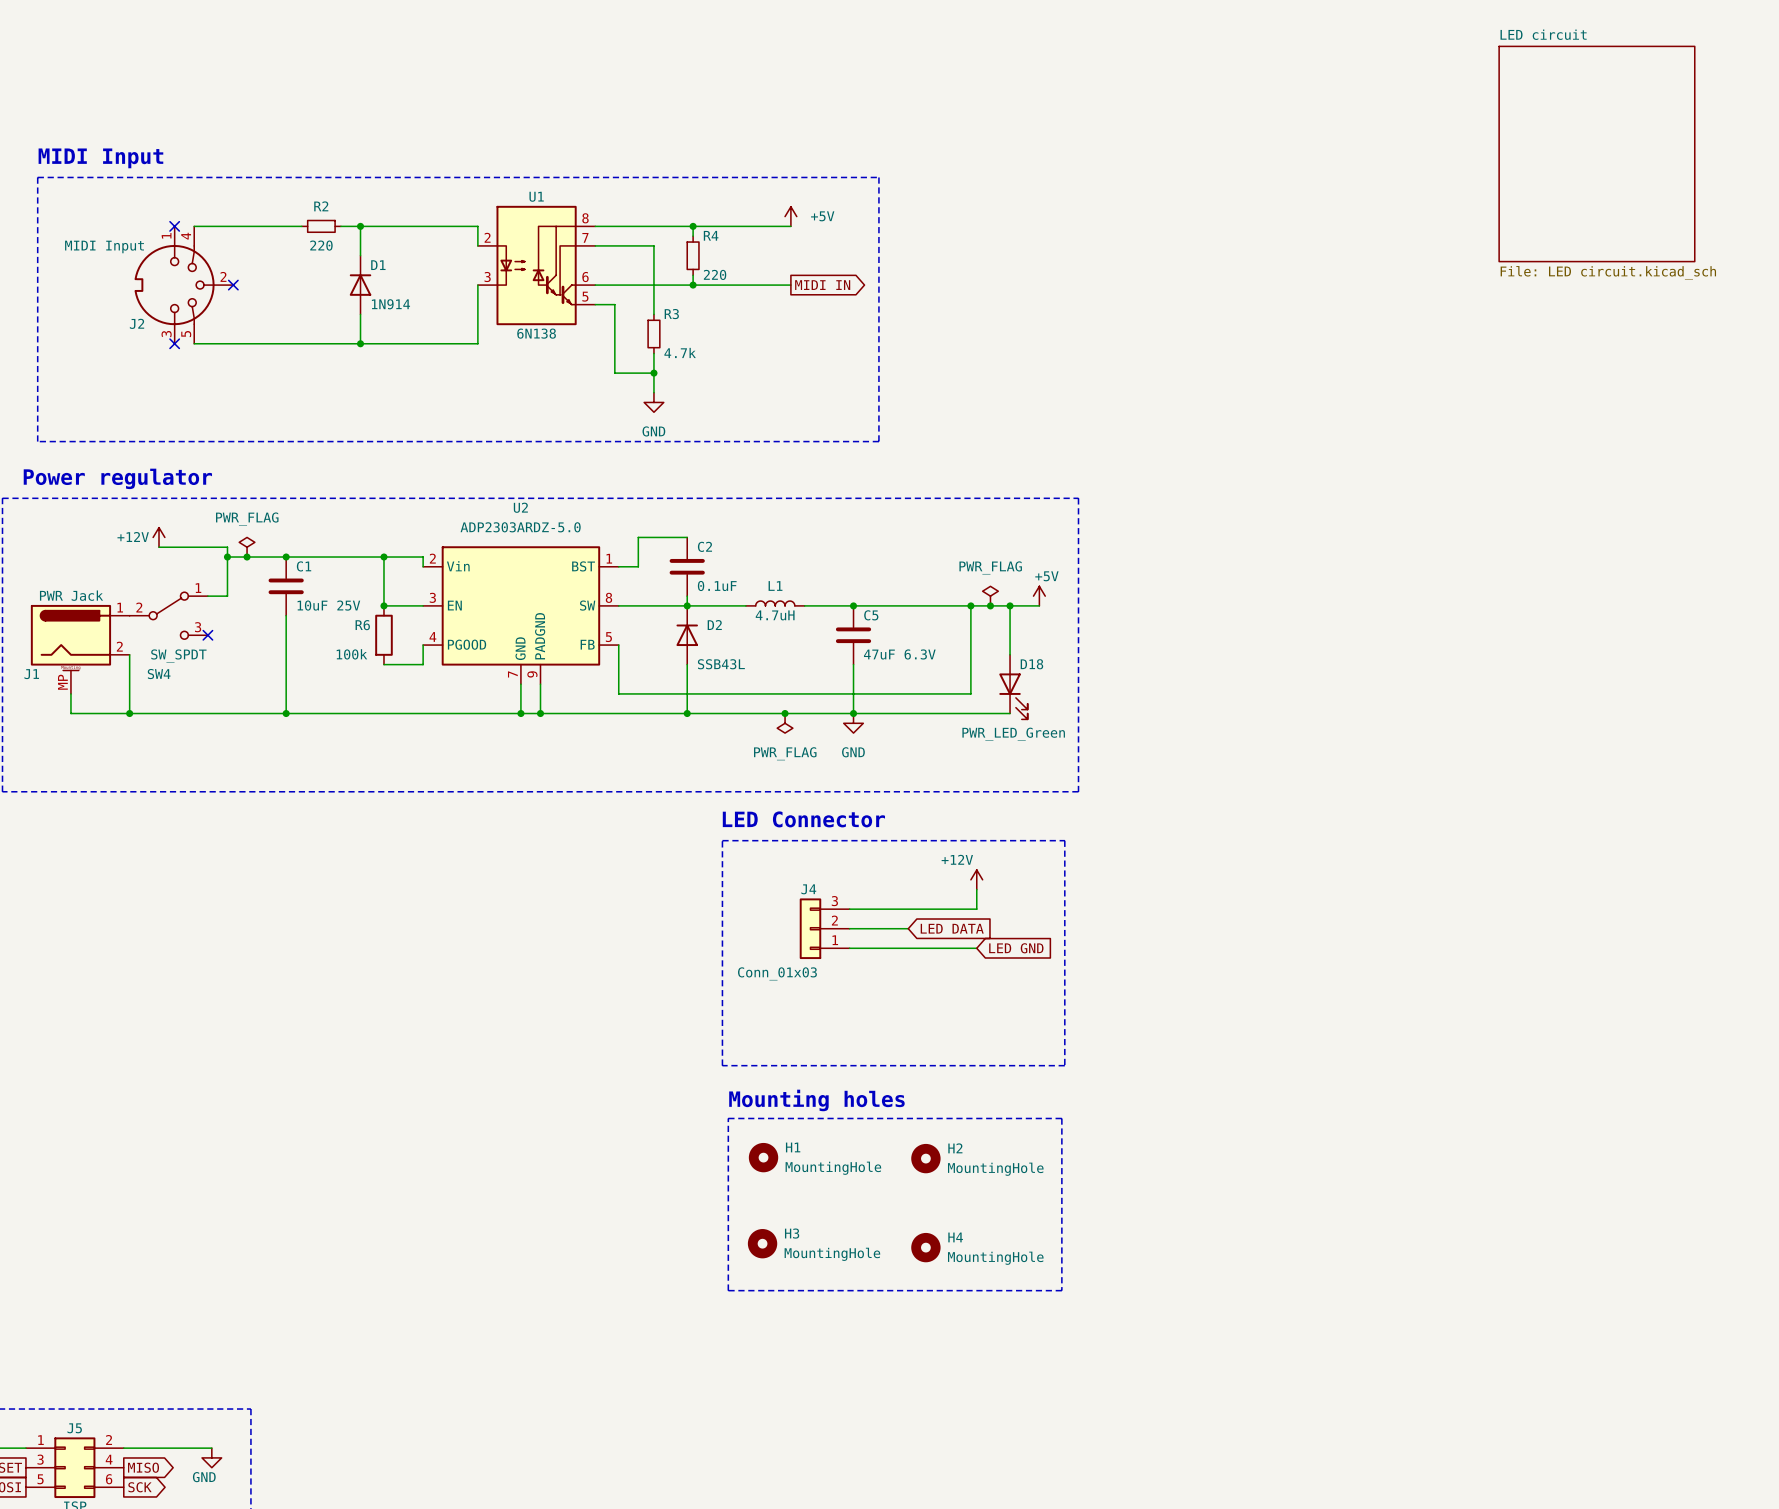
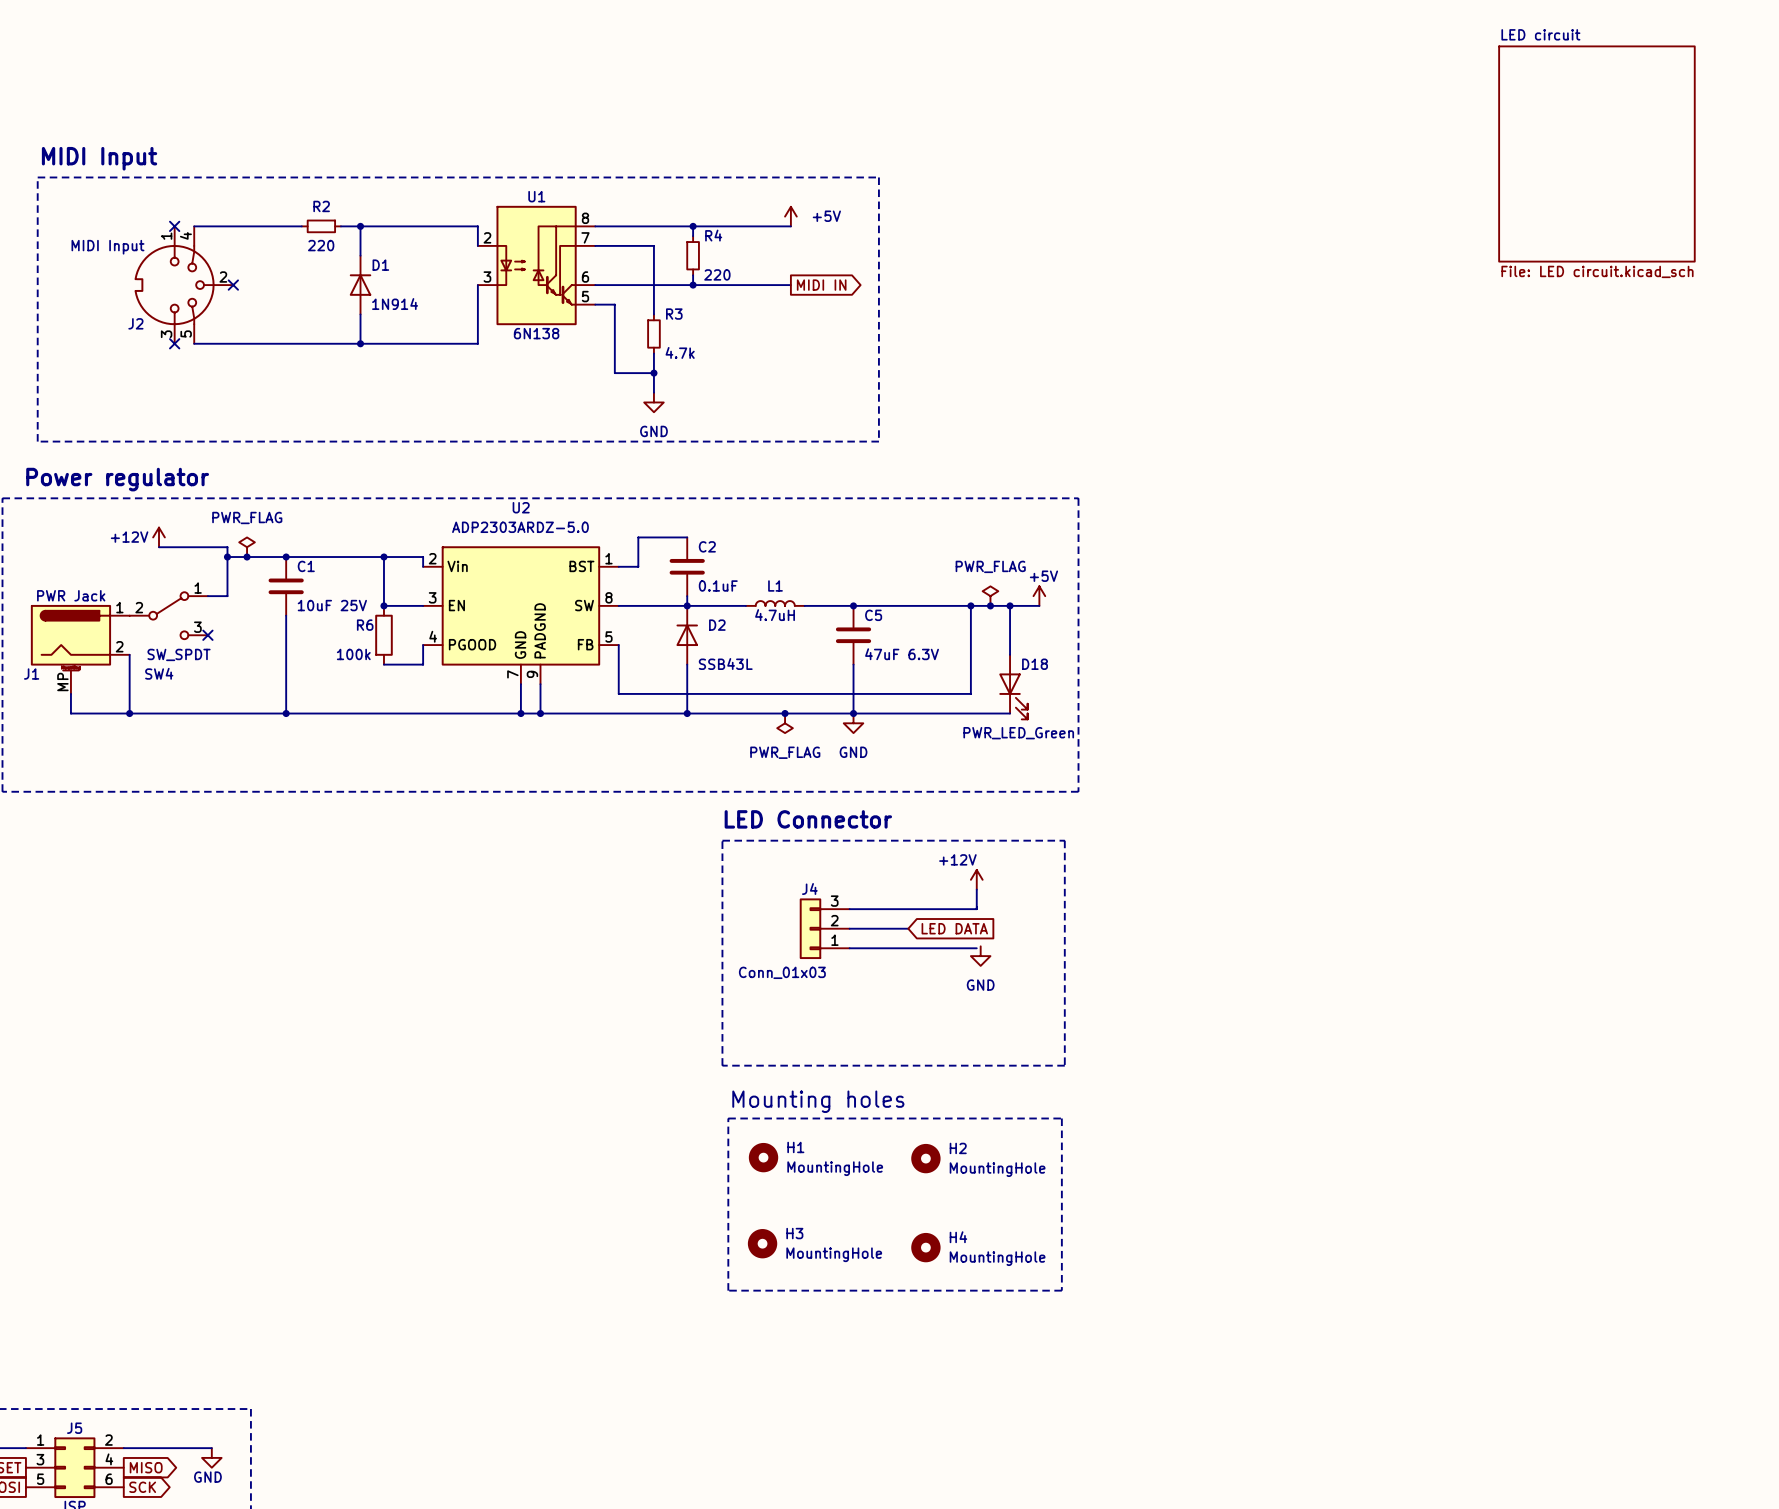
global label: LED GND (1016, 948) -> none
power symbol: none -> GND (980, 956)

